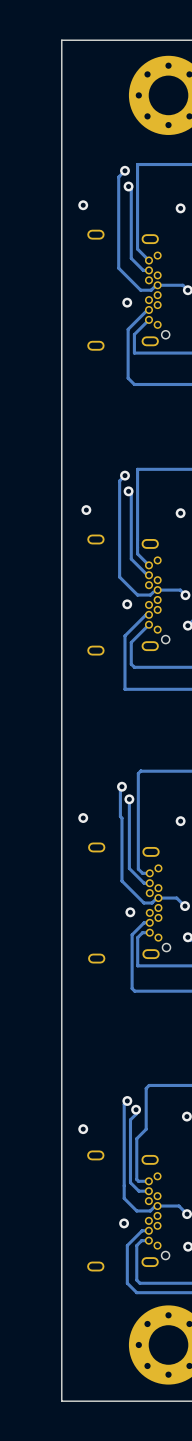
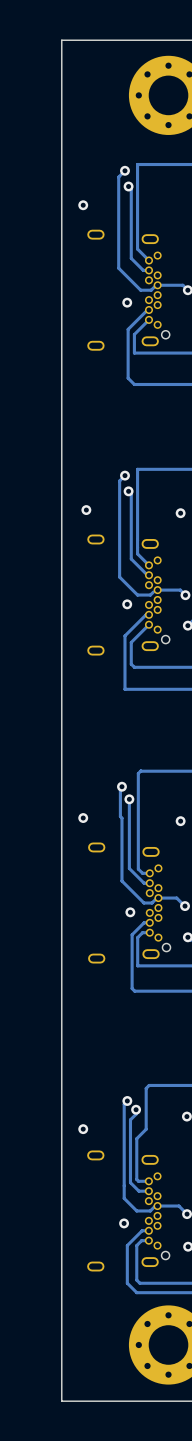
via: (180, 208) -> none

